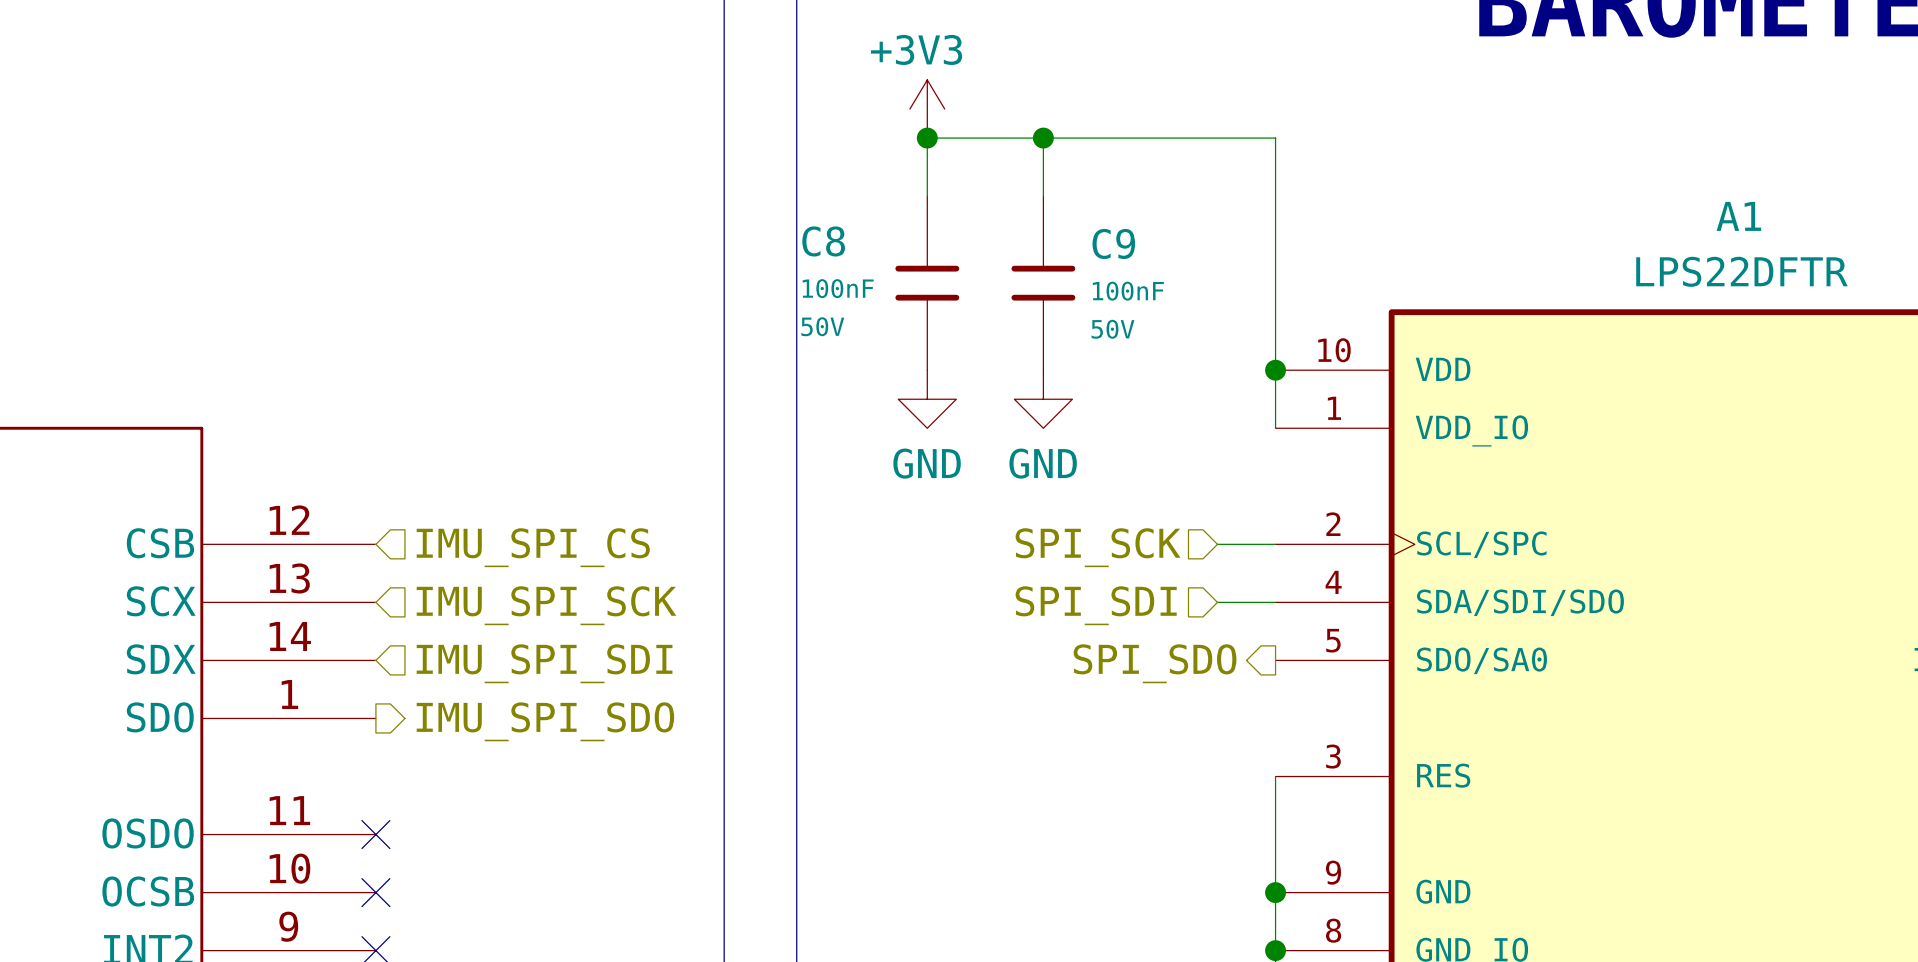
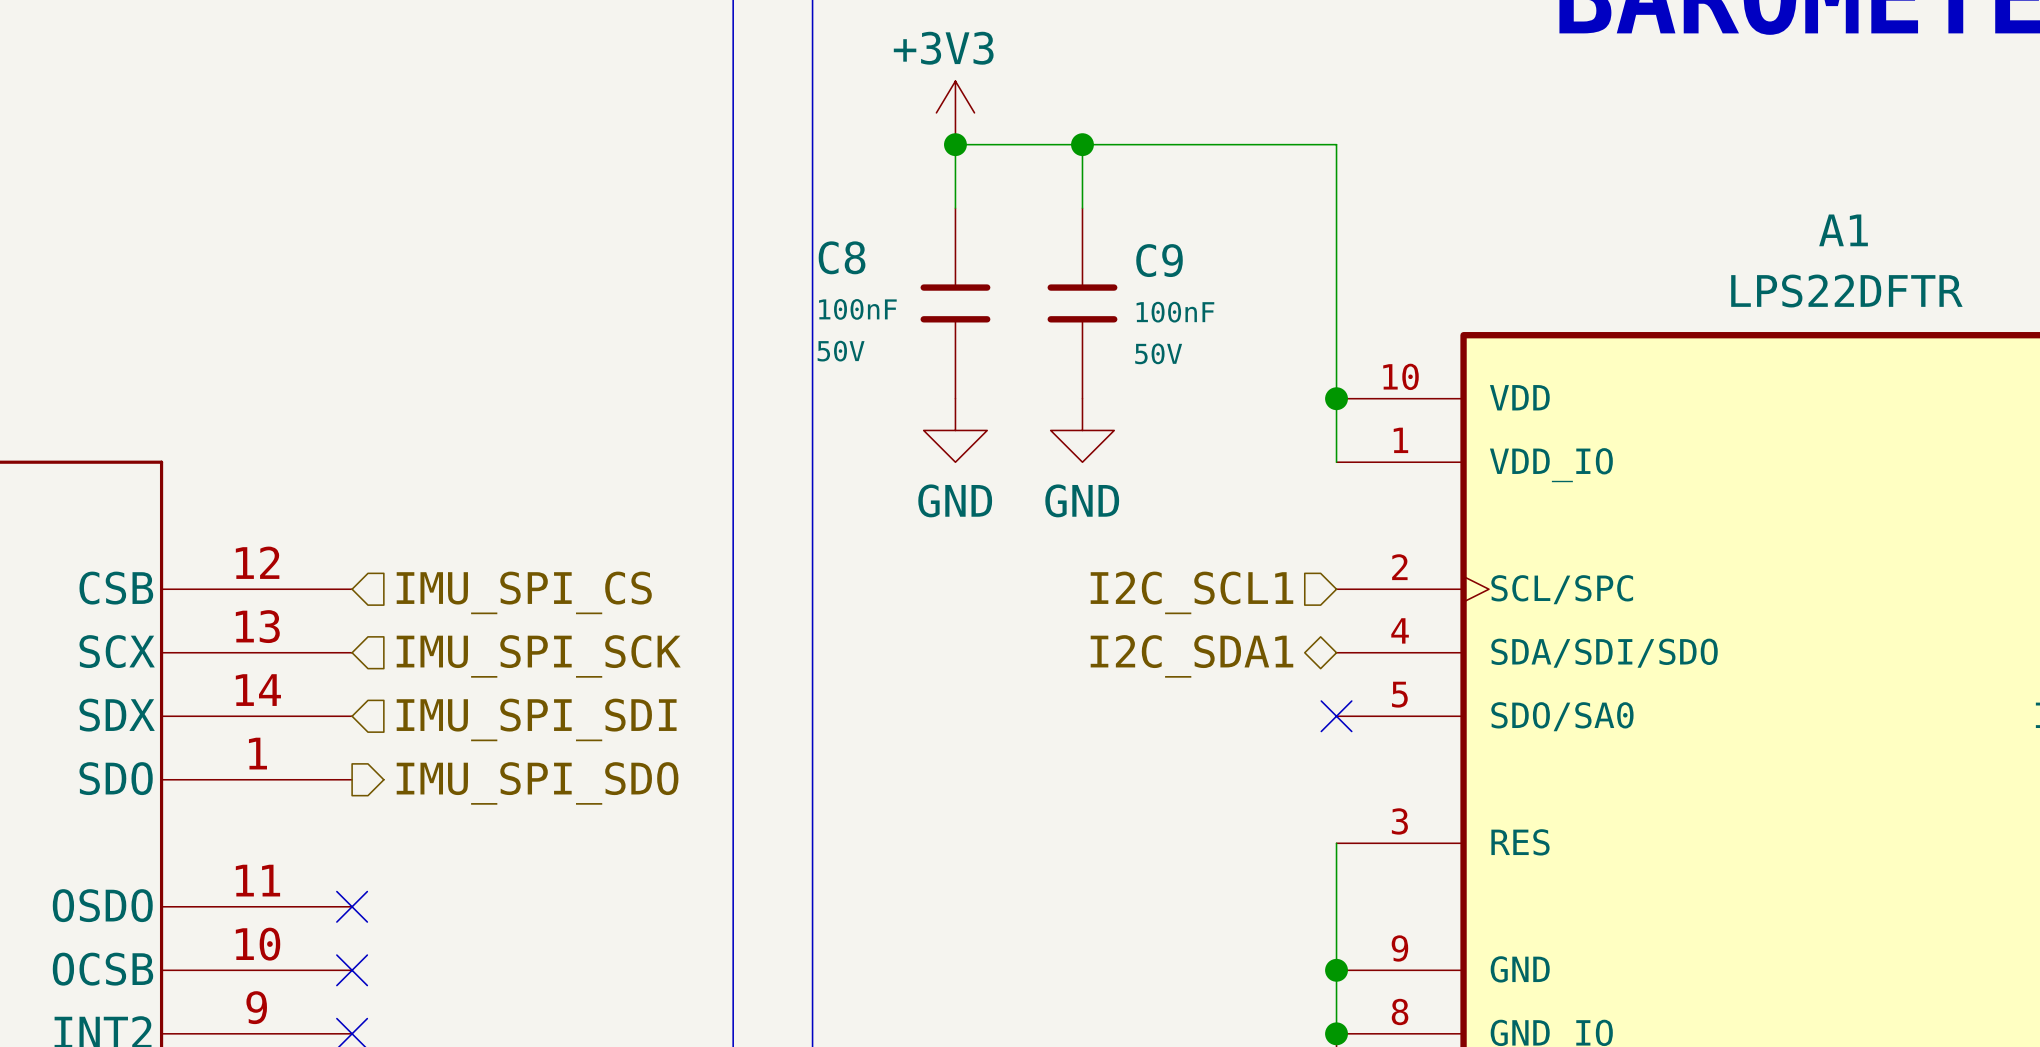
wire: (1217, 544) (1275, 544) -> none
hierarchical label: SPI_SCK (1098, 547) -> none
hierarchical label: none -> I2C_SCL1 (1191, 592)
wire: (1217, 602) (1275, 602) -> none
hierarchical label: SPI_SDI (1096, 605) -> none
hierarchical label: none -> I2C_SDA1 (1191, 656)
no-connect mark: none -> (1336, 716)
hierarchical label: SPI_SDO (1155, 663) -> none

